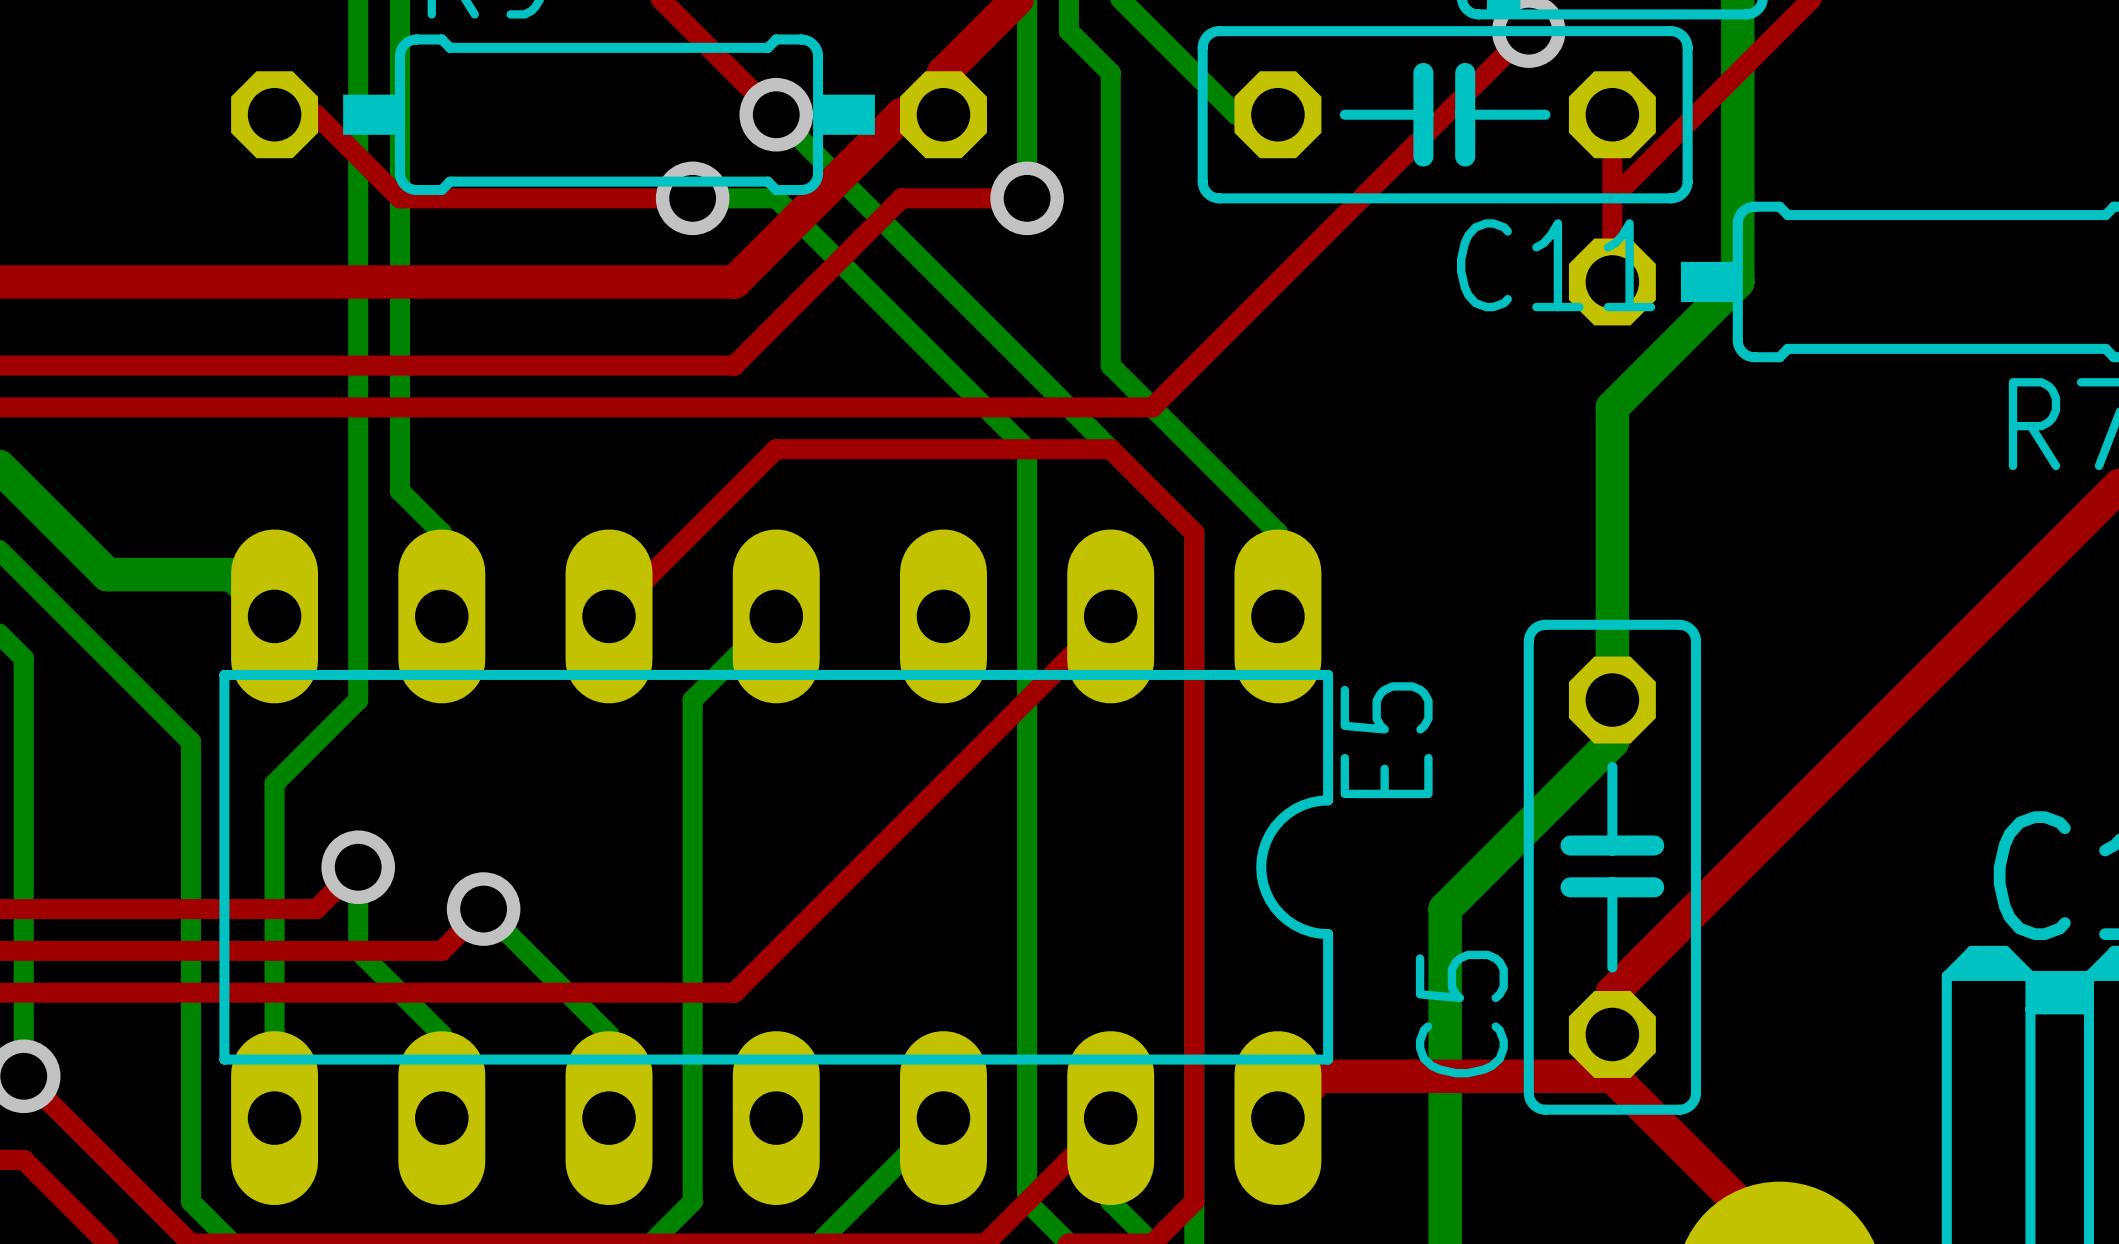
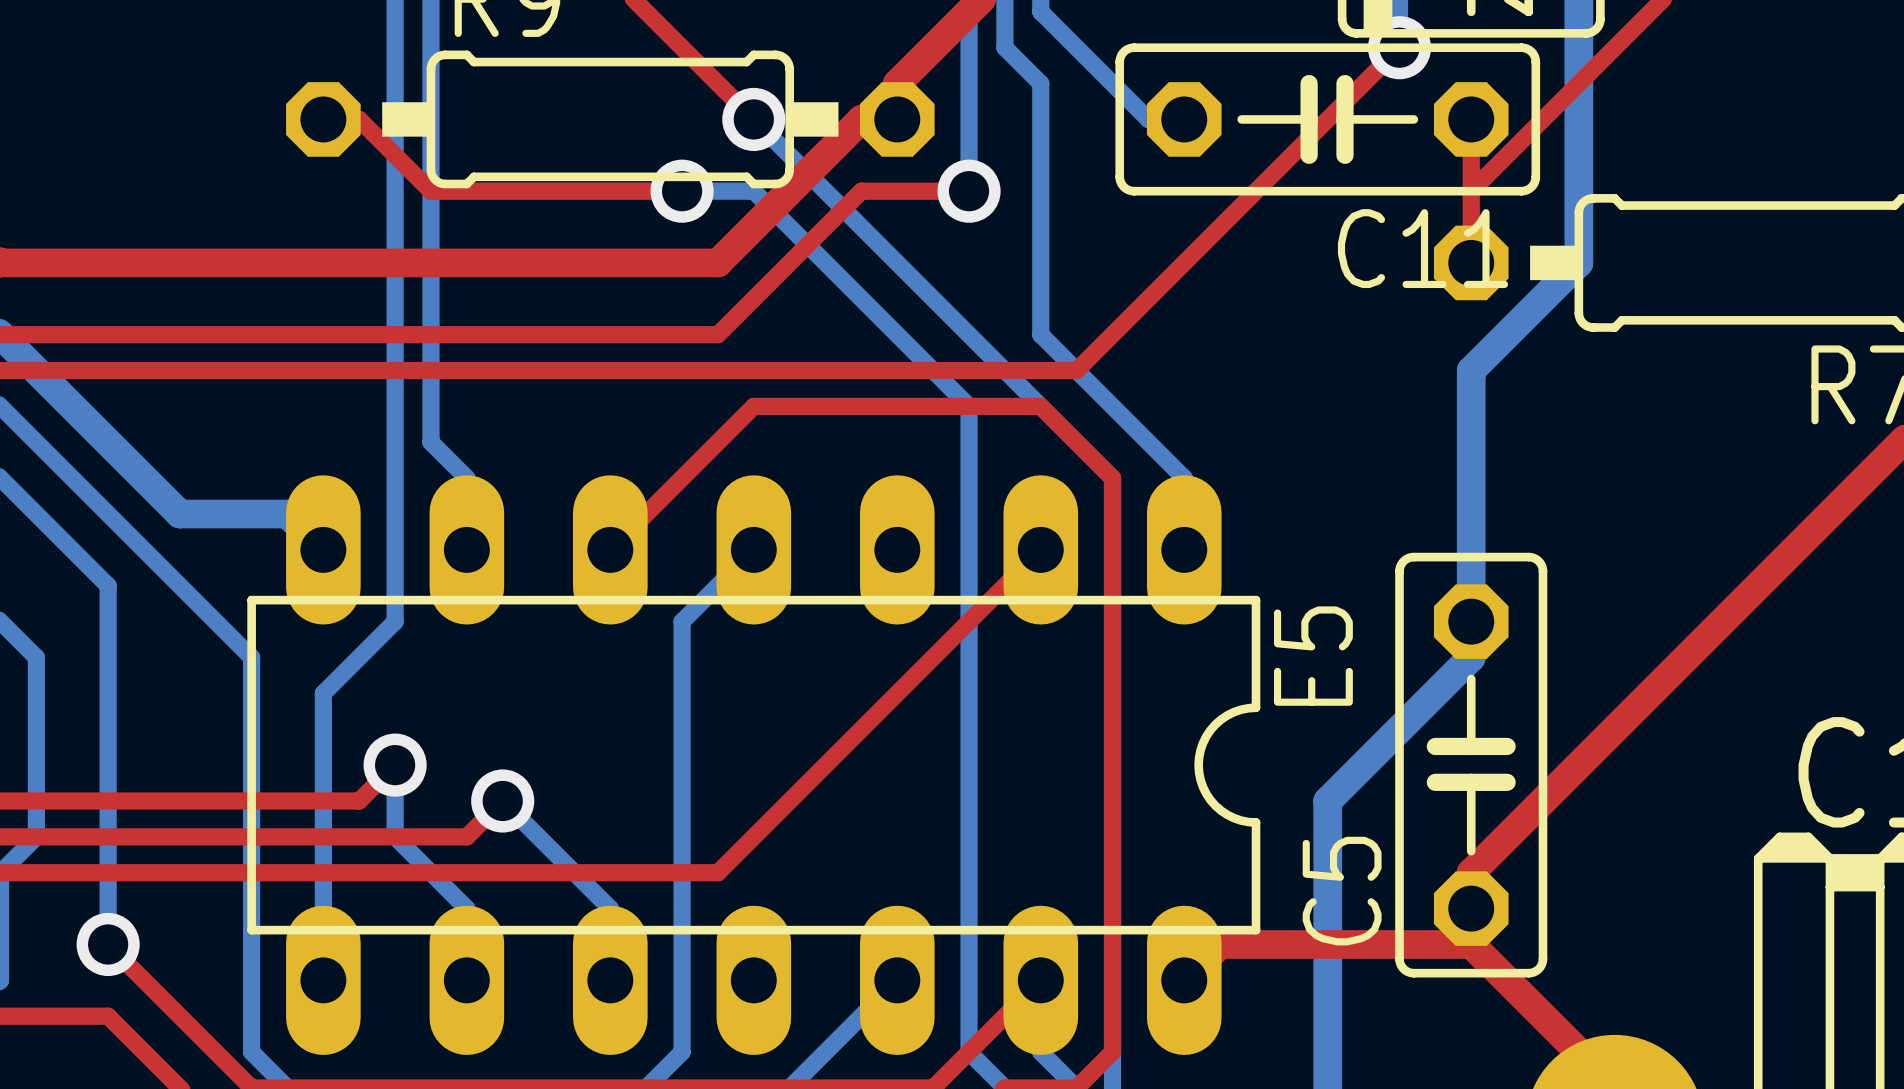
E5 footprint: [219, 529, 1334, 1206] -> [247, 475, 1261, 1055]
E5 name position: E5 (1386, 740) -> E5 (1313, 656)

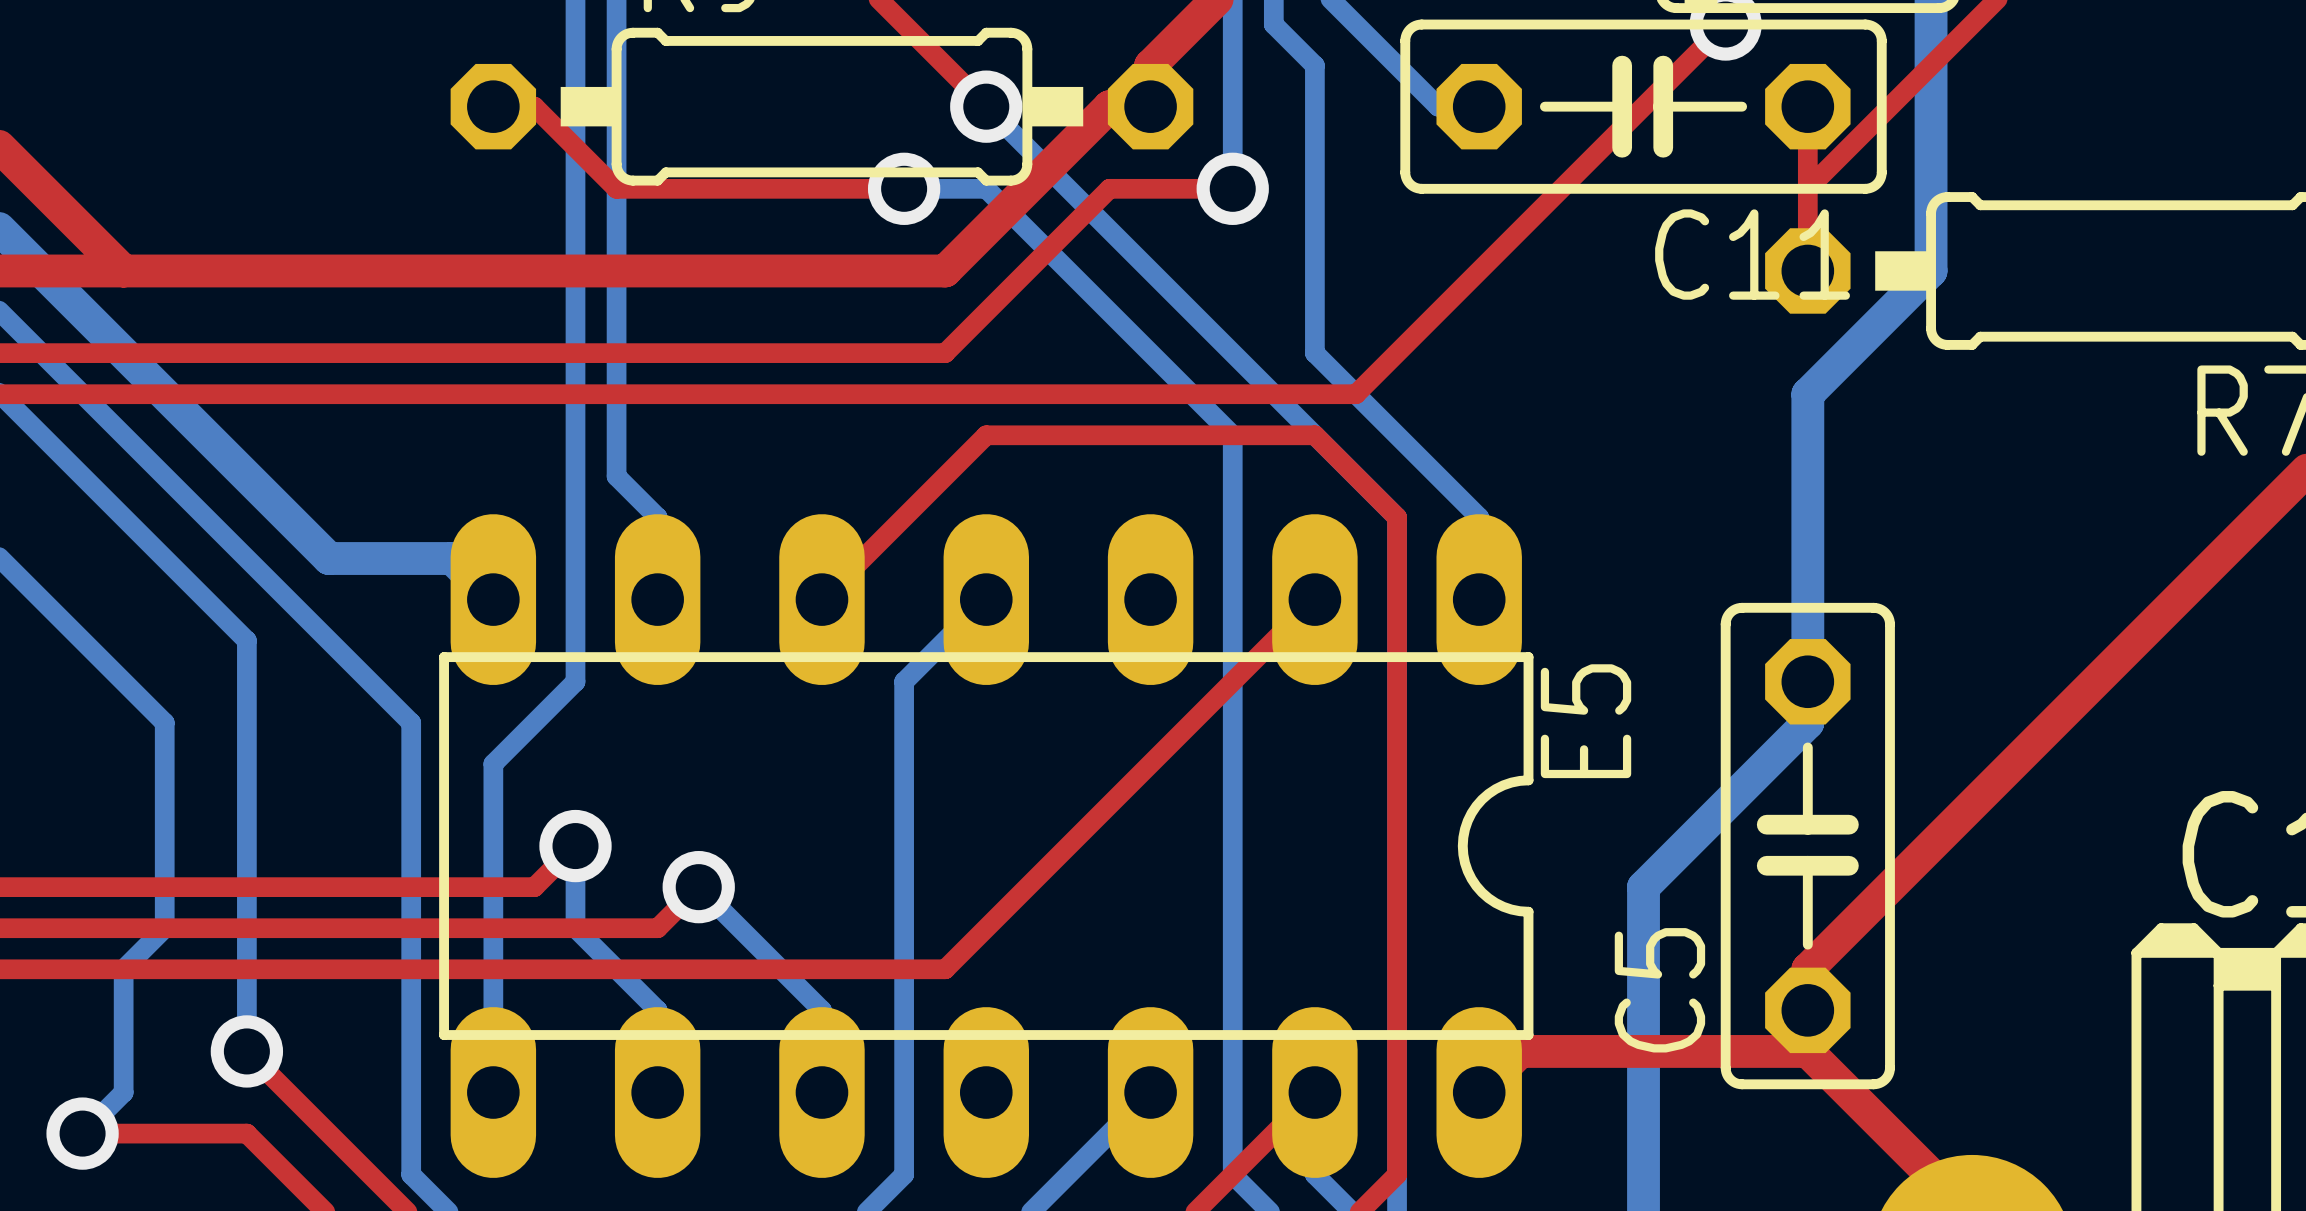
E5 footprint: [247, 475, 1261, 1055] -> [439, 514, 1534, 1178]
E5 name position: E5 (1313, 656) -> E5 (1586, 721)

